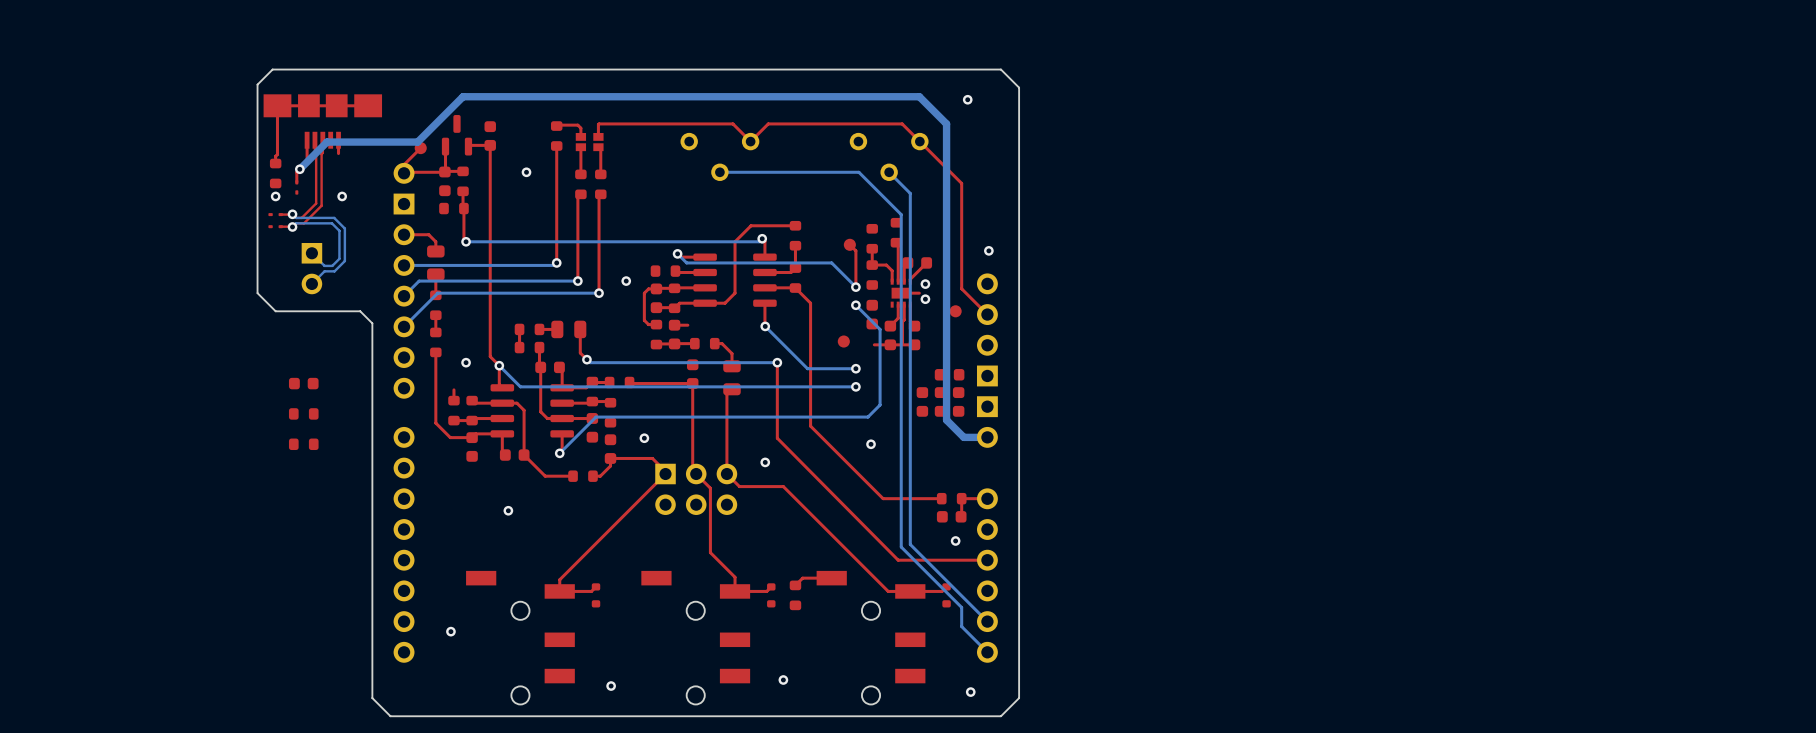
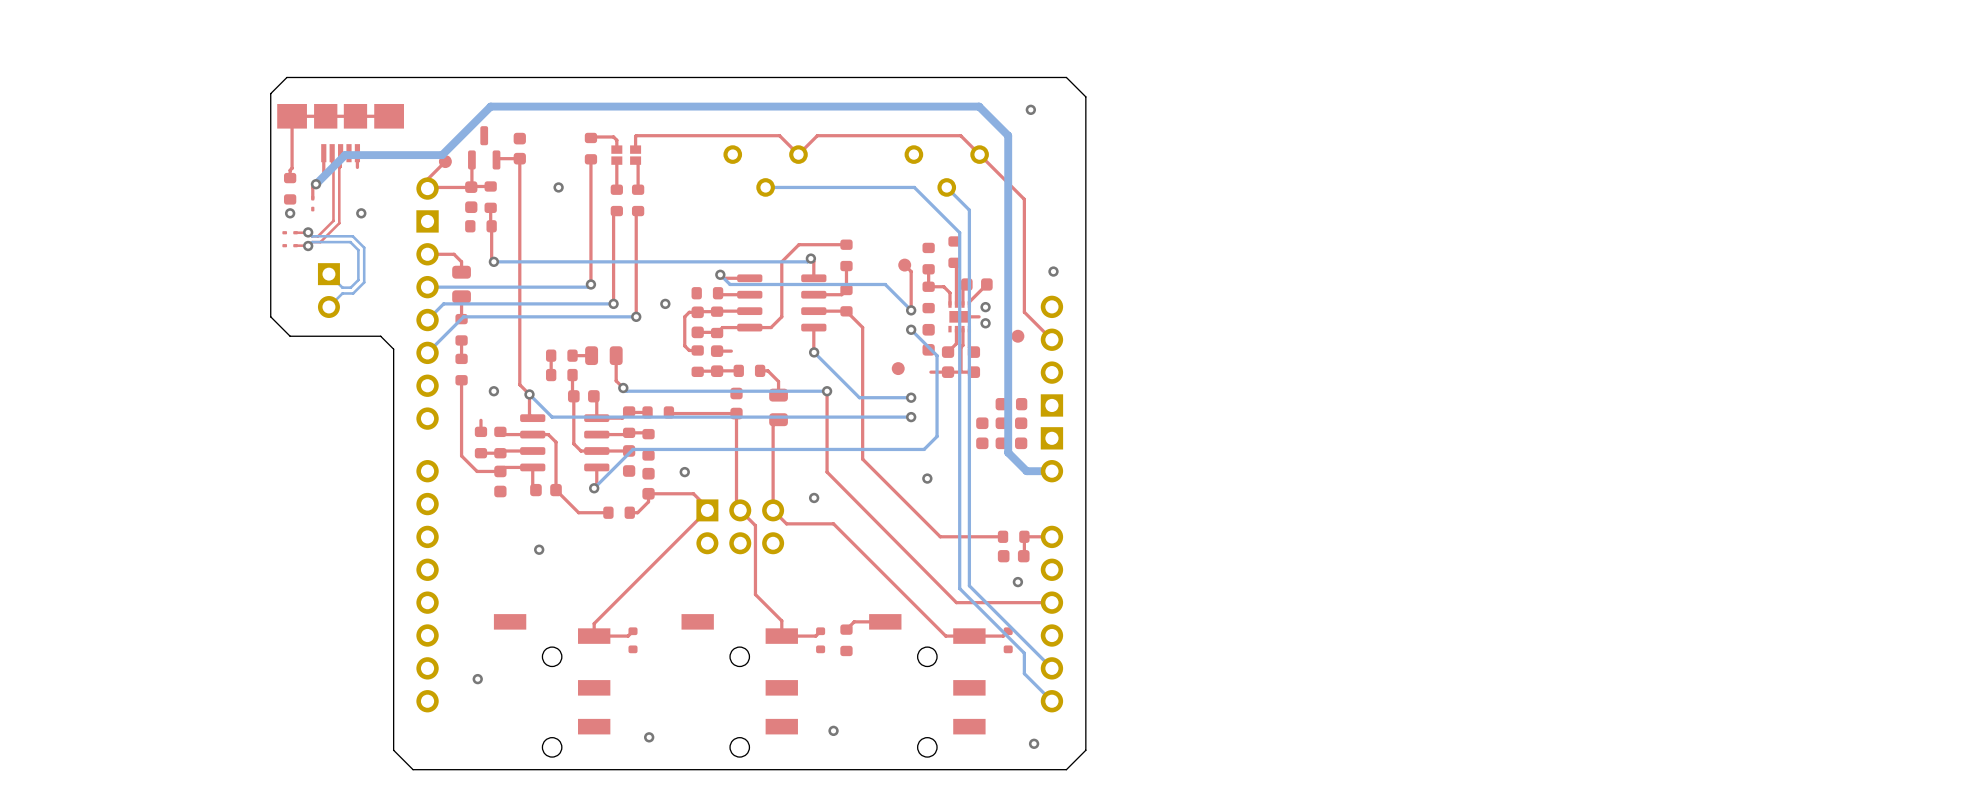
part: (303, 383) -> none
part: (303, 413) -> none
part: (303, 444) -> none

